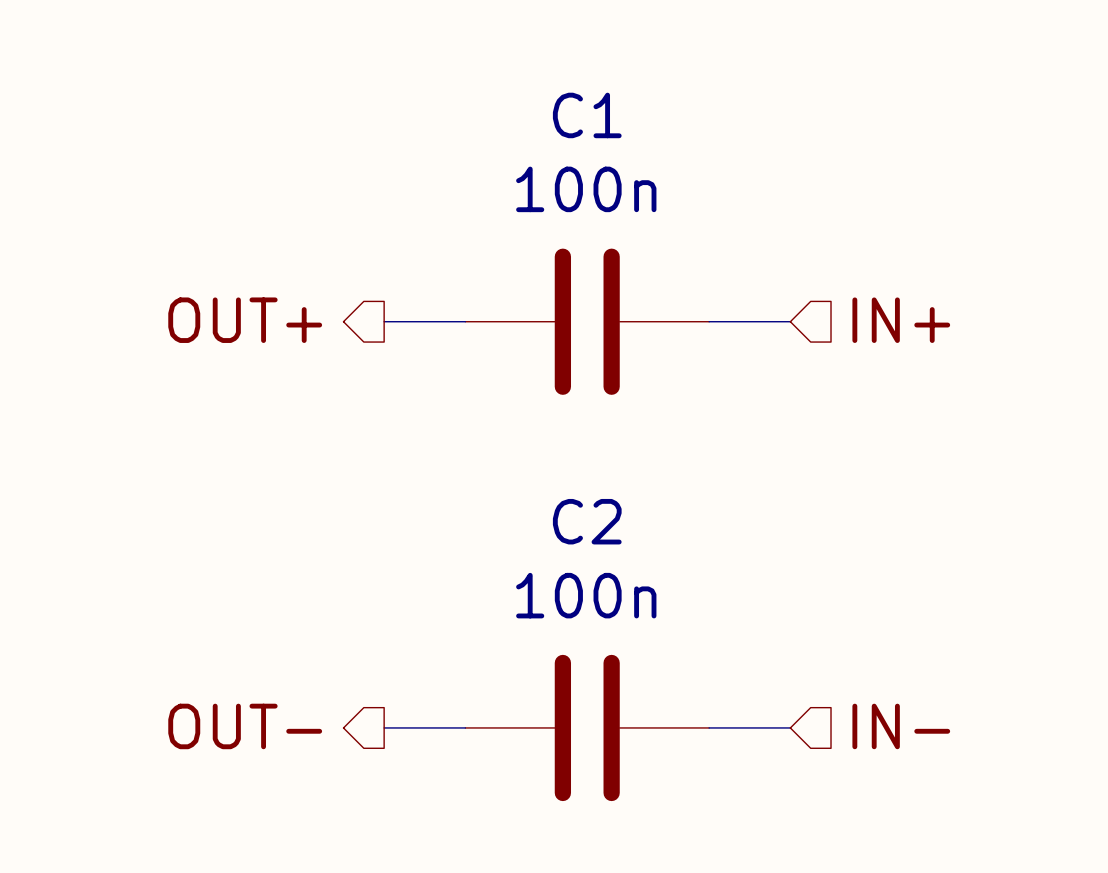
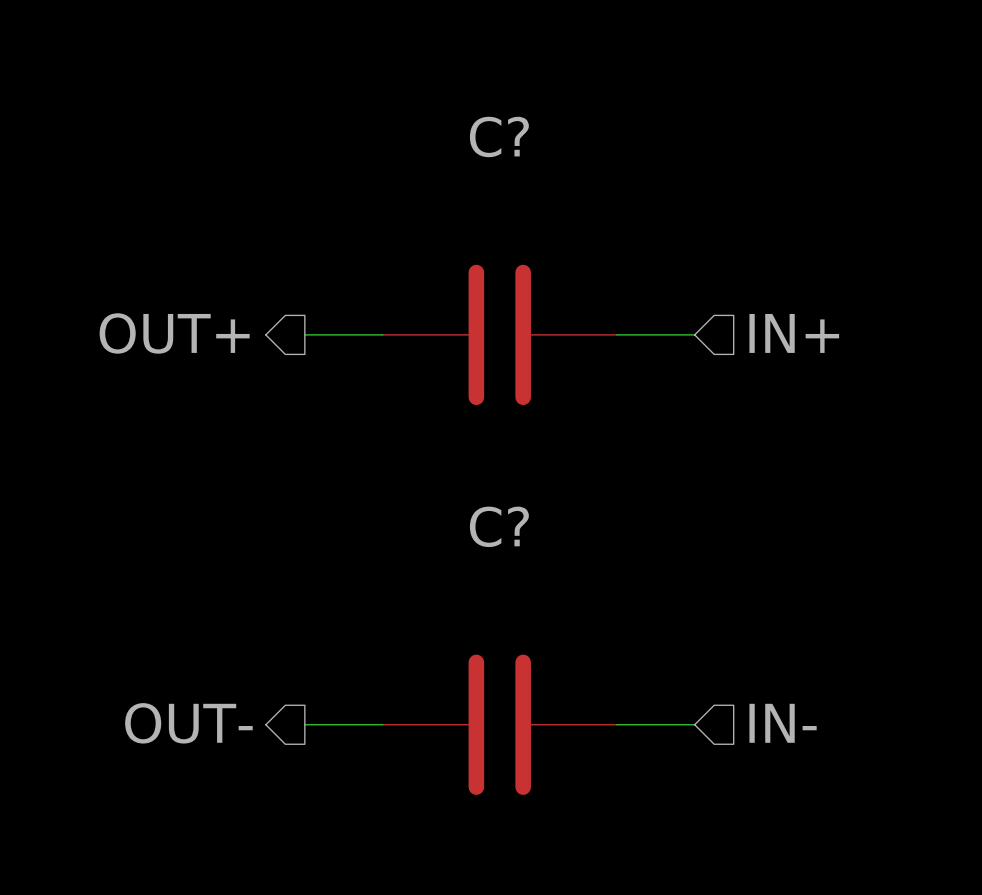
C1 name: C1 (587, 115) -> C? (499, 136)
C1 value: 100n (586, 189) -> none
C2 name: C2 (587, 521) -> C? (499, 526)
C2 value: 100n (586, 595) -> none

